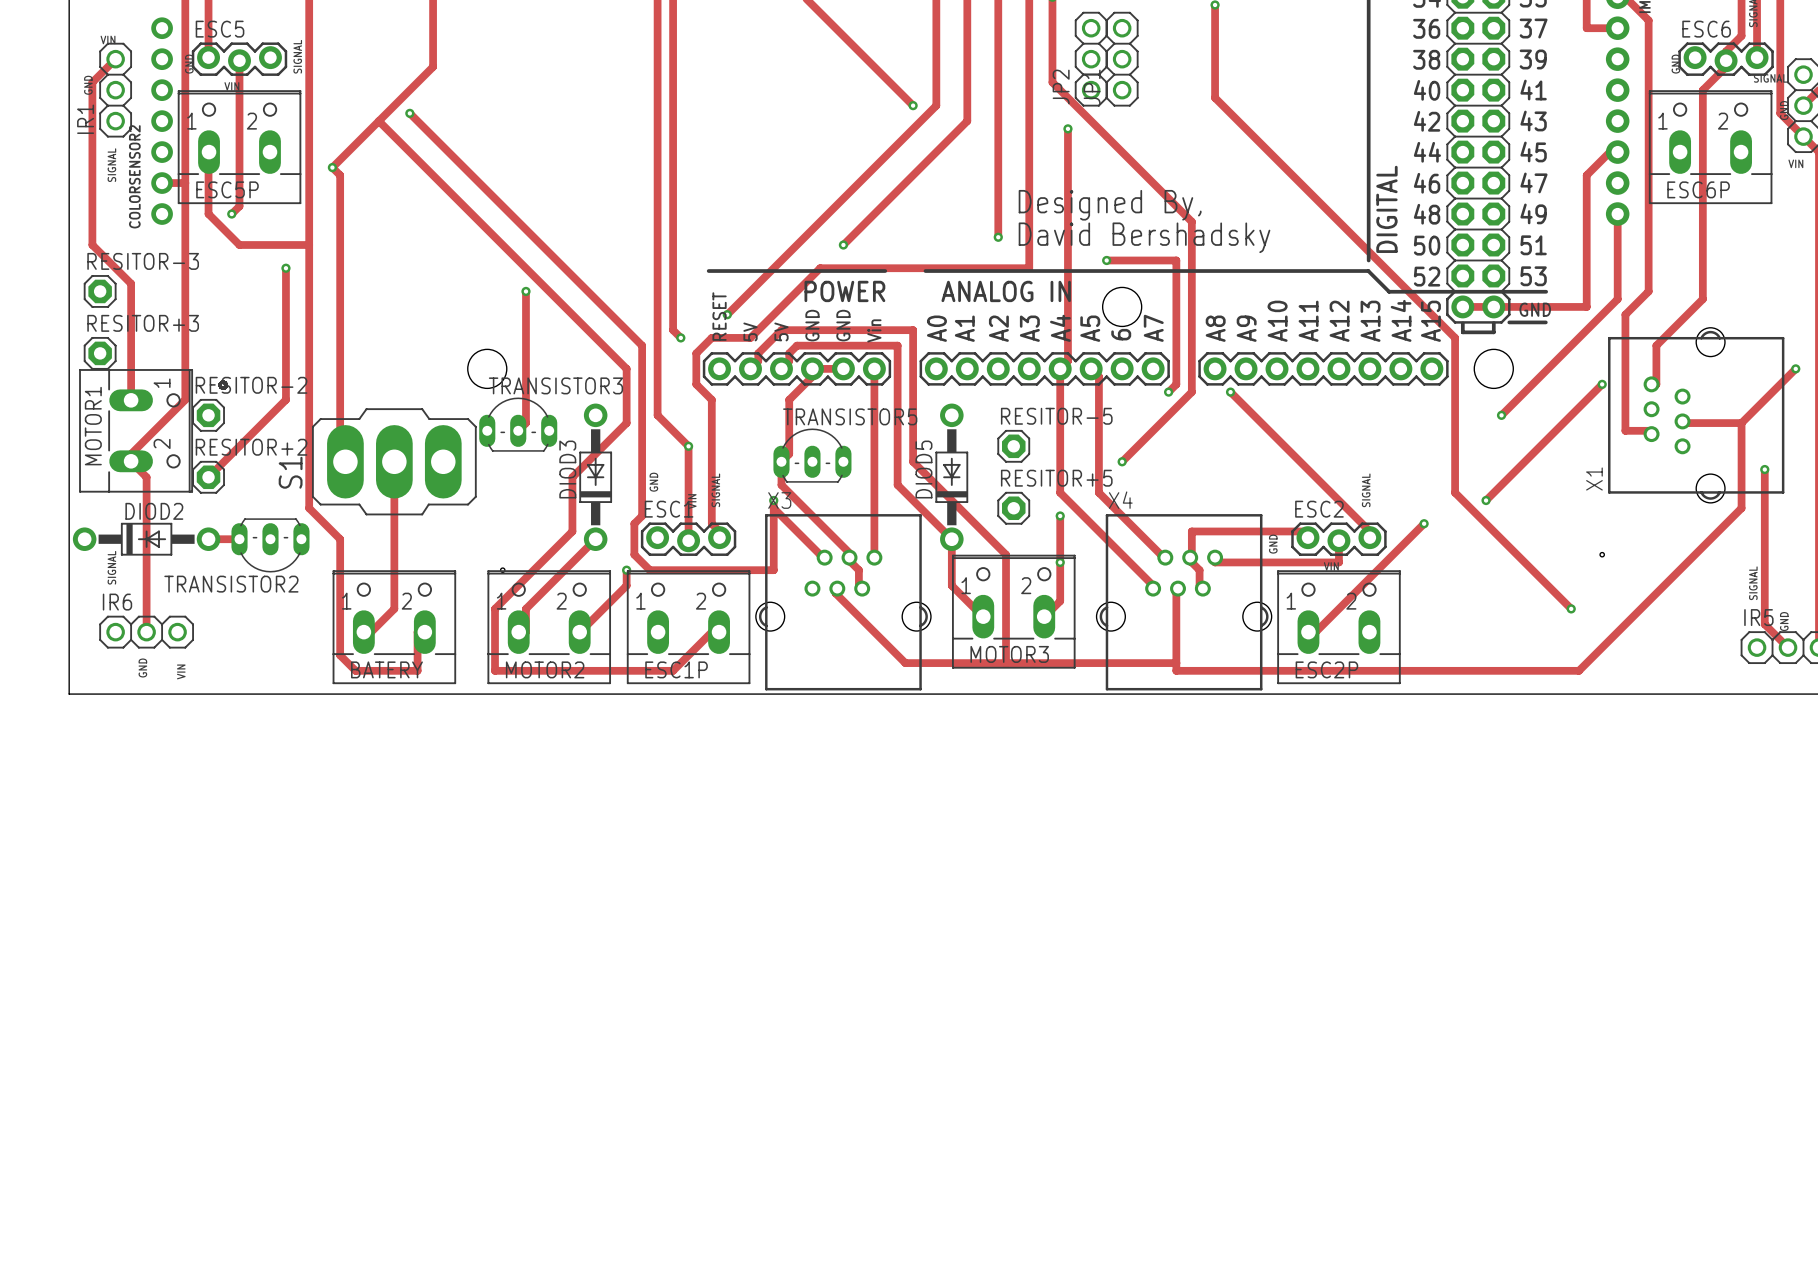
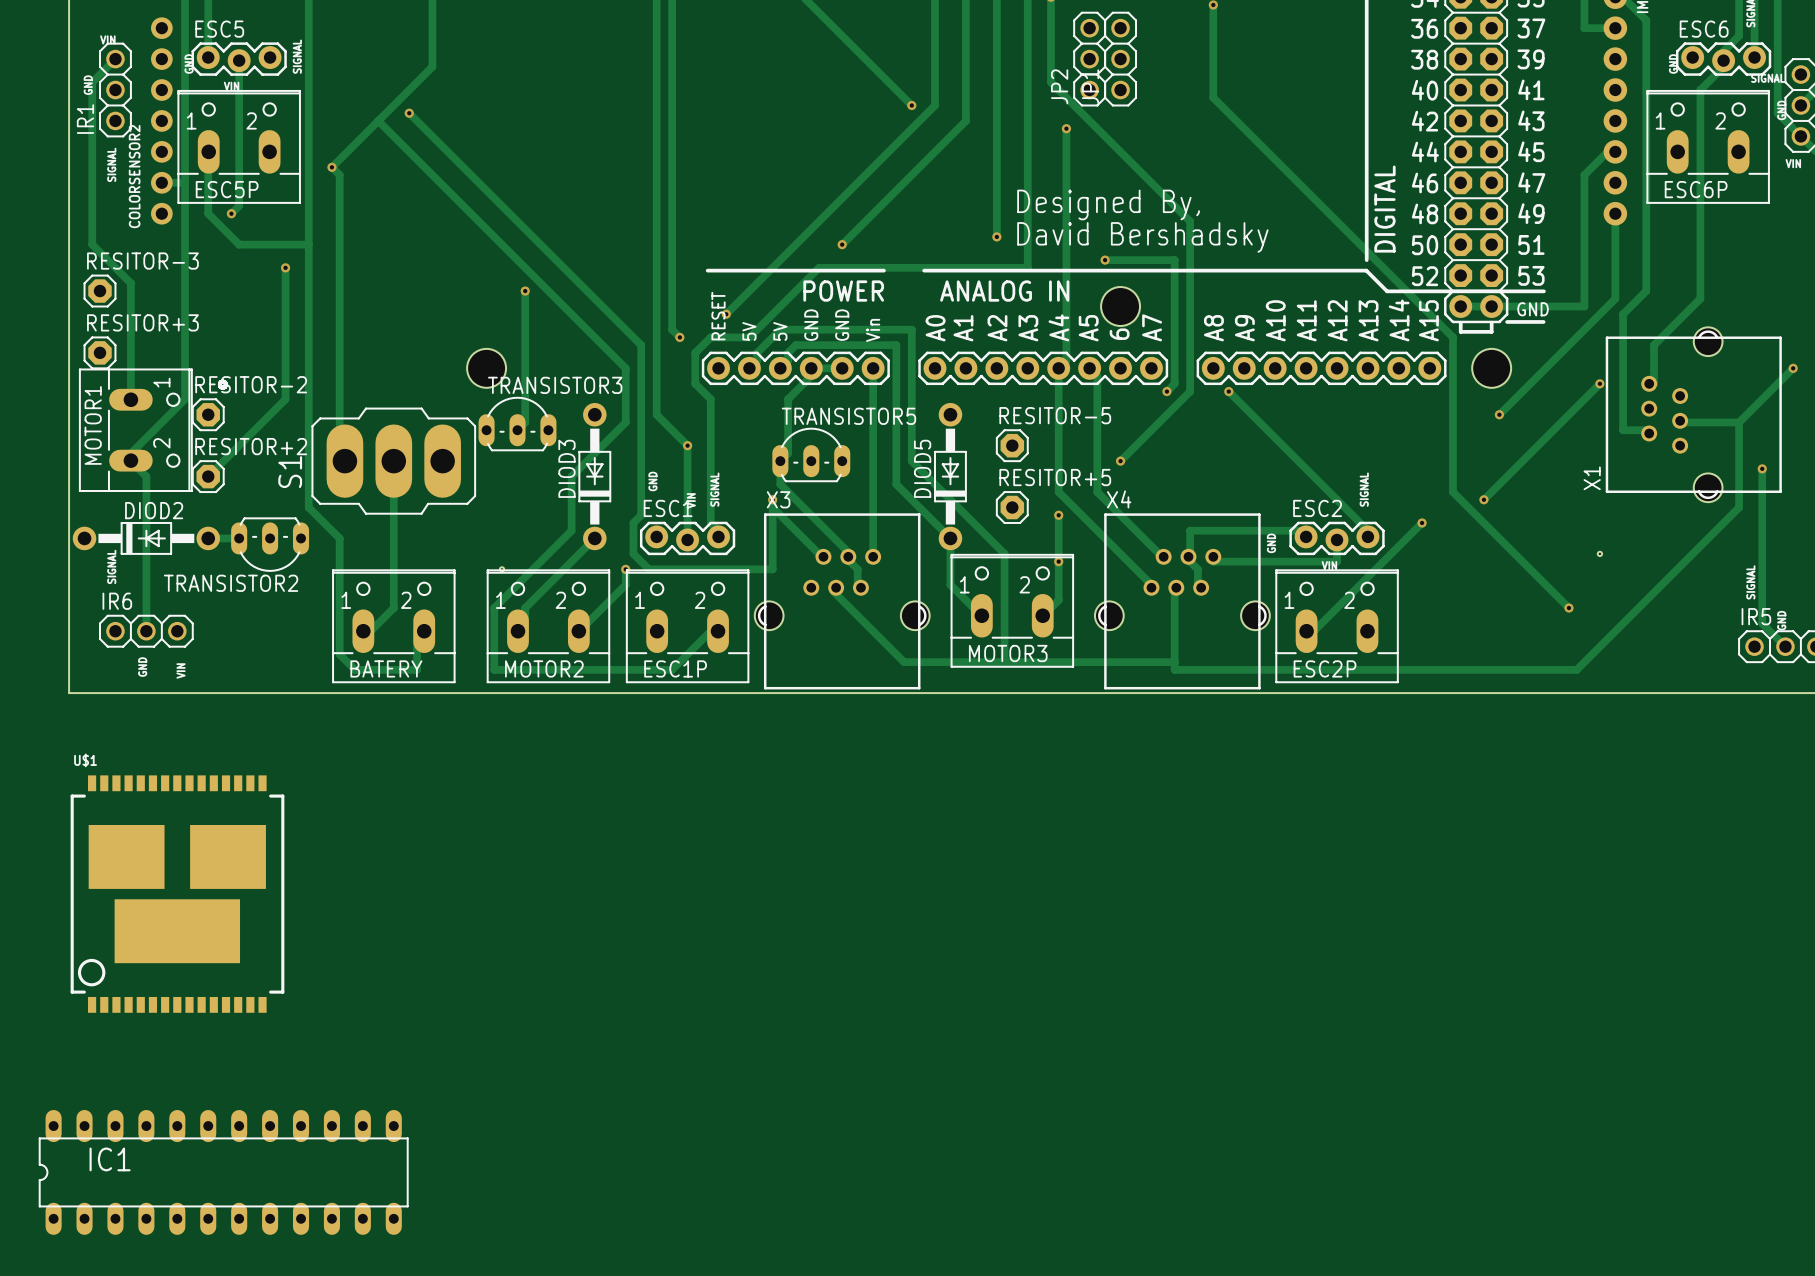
U$1: none -> (177, 894)
IC1: none -> (223, 1172)

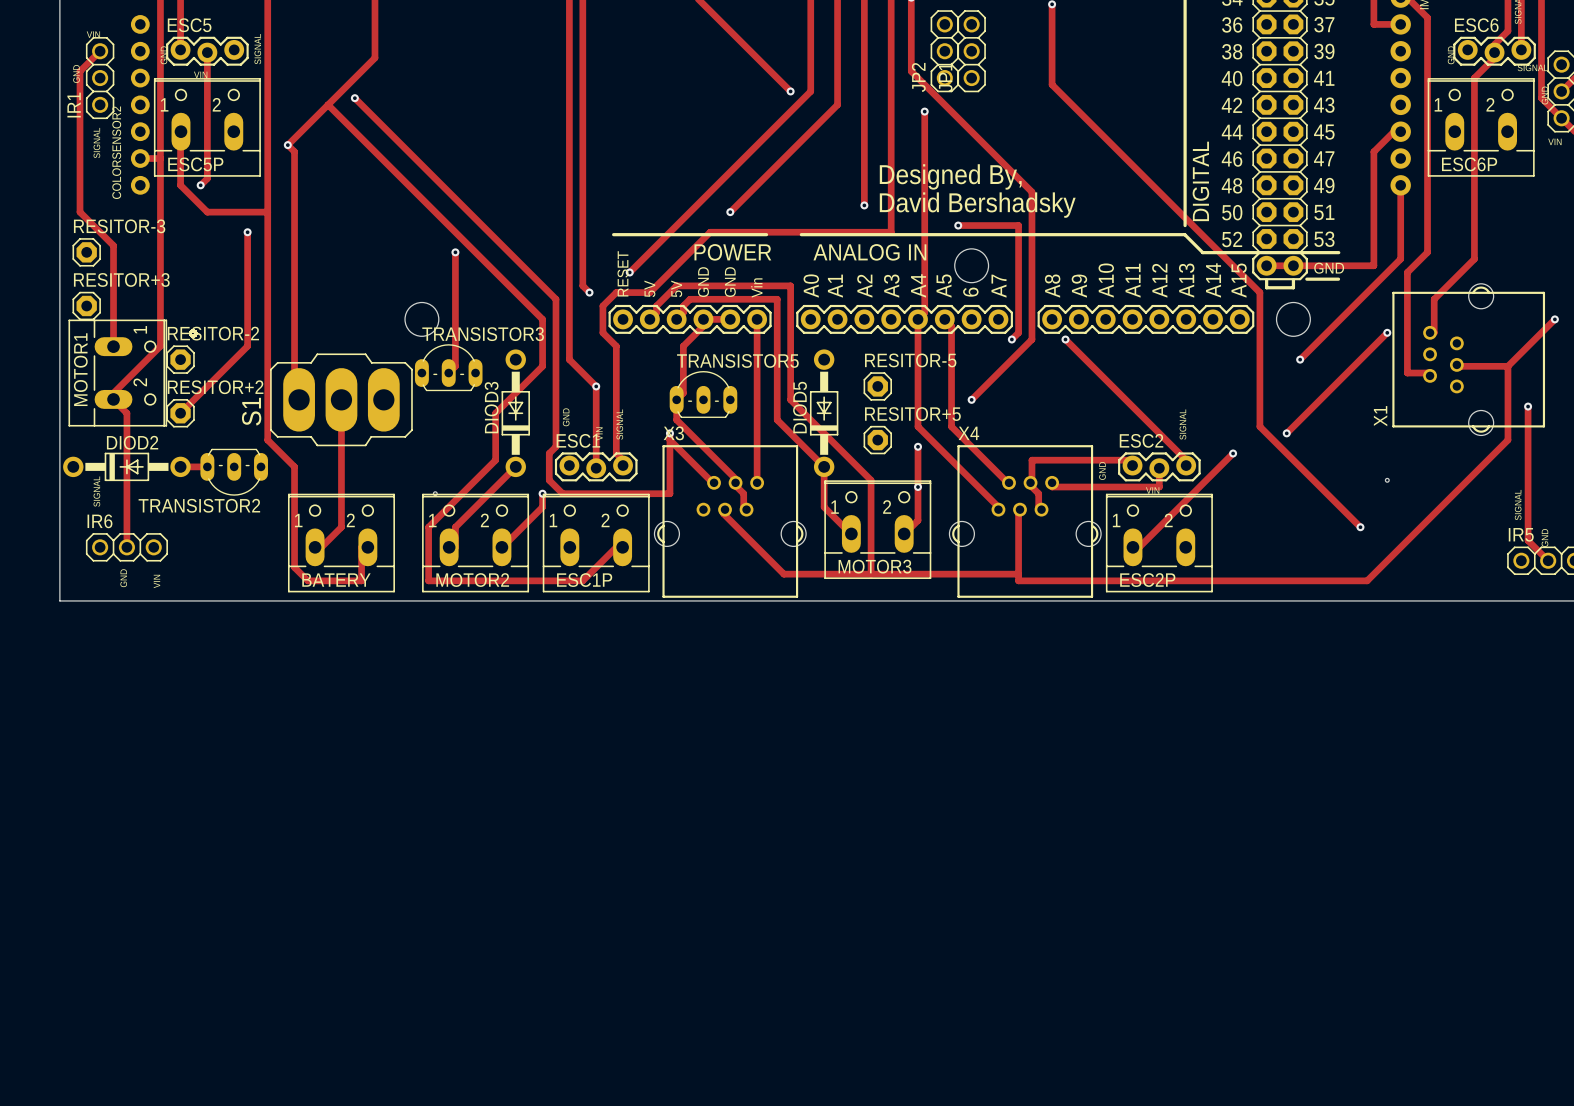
U$1: (177, 894) -> none
IC1: (223, 1172) -> none

